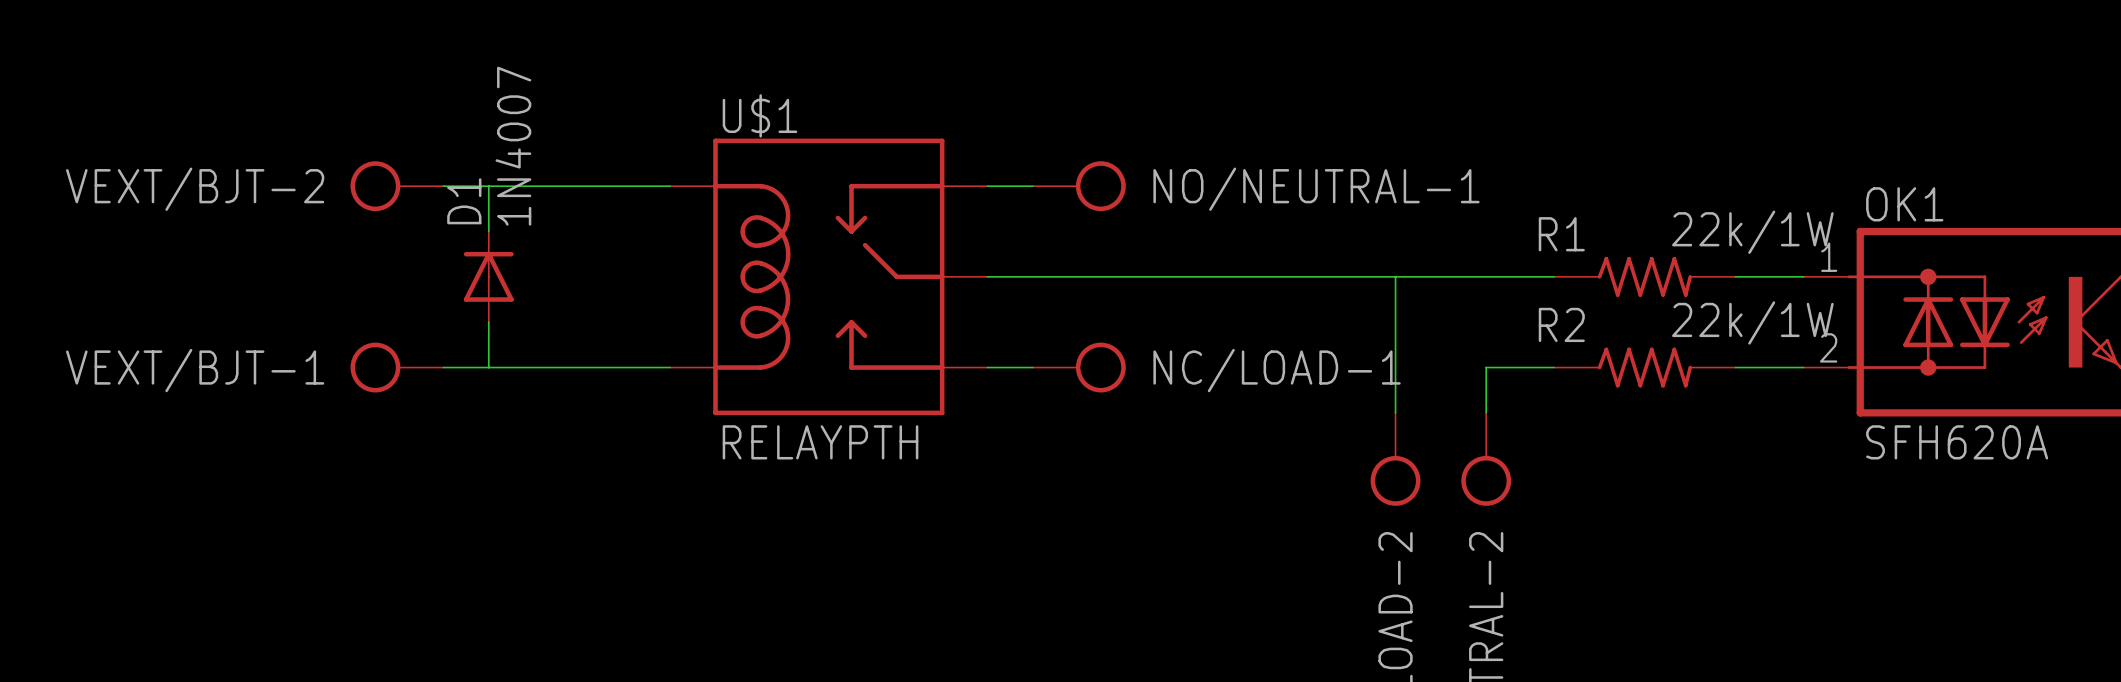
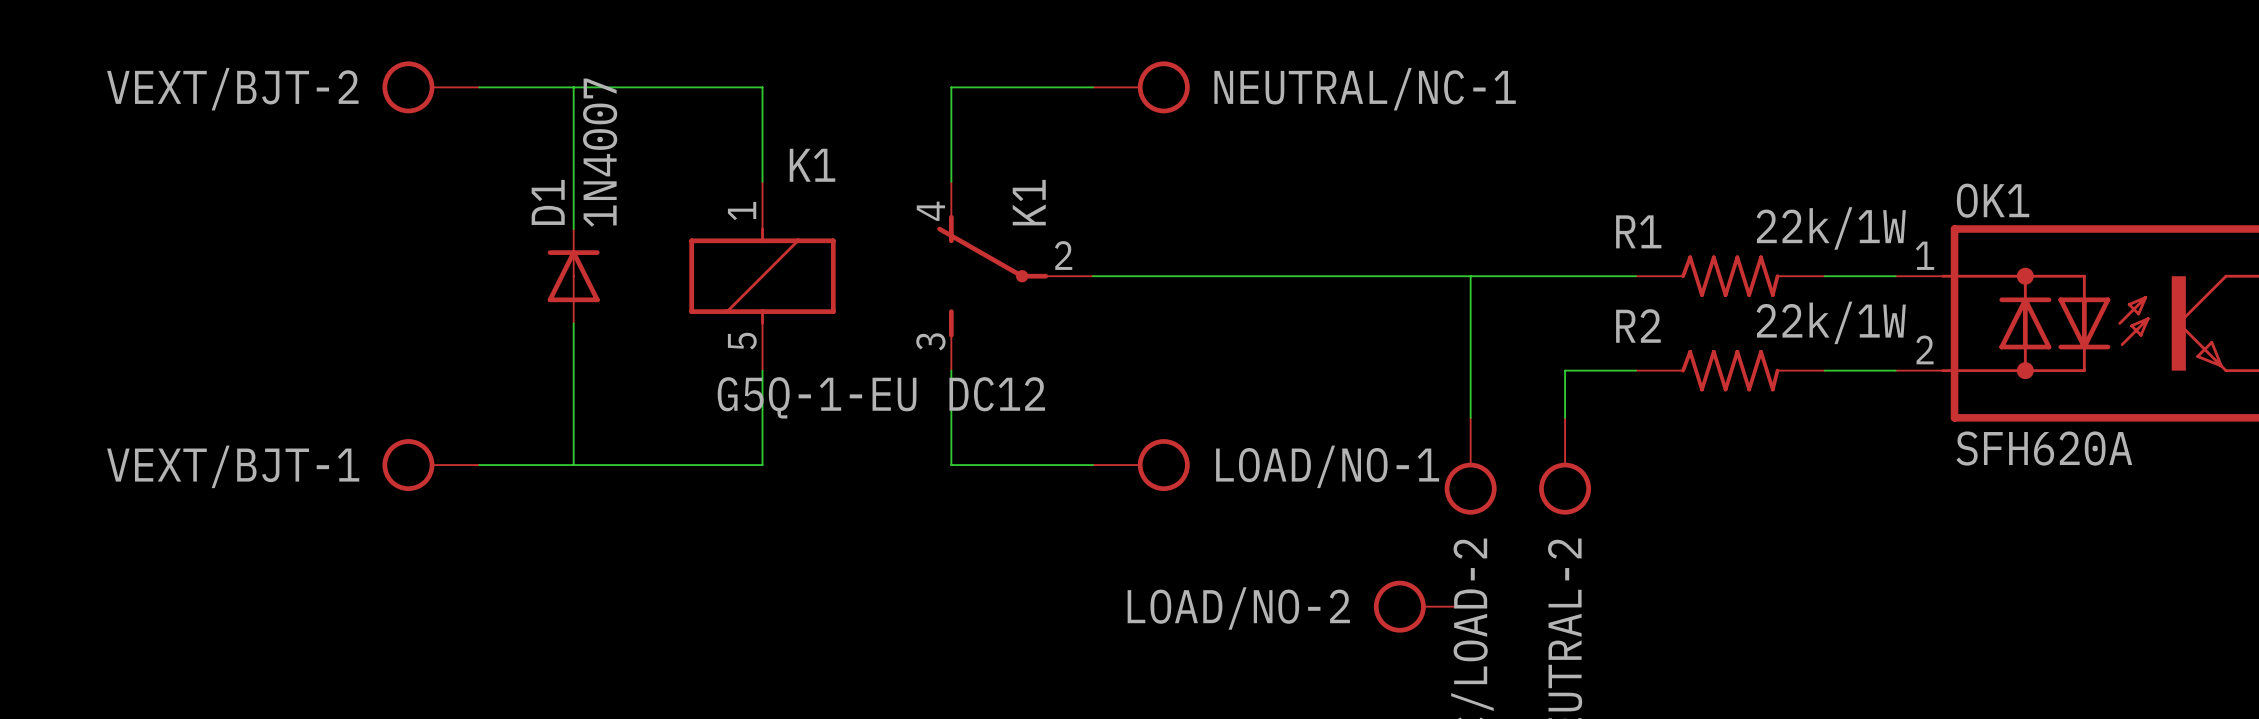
wire: none -> (479, 87) (762, 87) (762, 181)
wire: none -> (573, 87) (573, 229)
wire: none -> (1092, 87) (951, 87) (951, 181)
NEUTRAL/NC-1: none -> (1141, 87)
VEXT/BJT-2 position: (396, 186) -> (430, 87)
wire: (443, 186) (670, 186) -> none
wire: (488, 186) (488, 231) -> none
wire: (987, 186) (1032, 186) -> none
NO/NEUTRAL-1: (1079, 186) -> none
D1 position: (488, 276) -> (573, 276)
K1: none -> G5Q-1-EU DC12 (762, 276)
U$1: RELAYPTH (828, 276) -> none
K1: none -> (1015, 276)
wire: (488, 322) (488, 367) -> none
wire: none -> (573, 323) (573, 465)
VEXT/BJT-1 position: (396, 367) -> (430, 465)
wire: (443, 367) (670, 367) -> none
wire: none -> (762, 370) (762, 465) (479, 465)
wire: none -> (951, 370) (951, 465) (1092, 465)
wire: (987, 367) (1032, 367) -> none
NC/LOAD-1: (1079, 367) -> none
LOAD/NO-1: none -> (1141, 465)
LOAD/NO-2: none -> (1422, 606)

